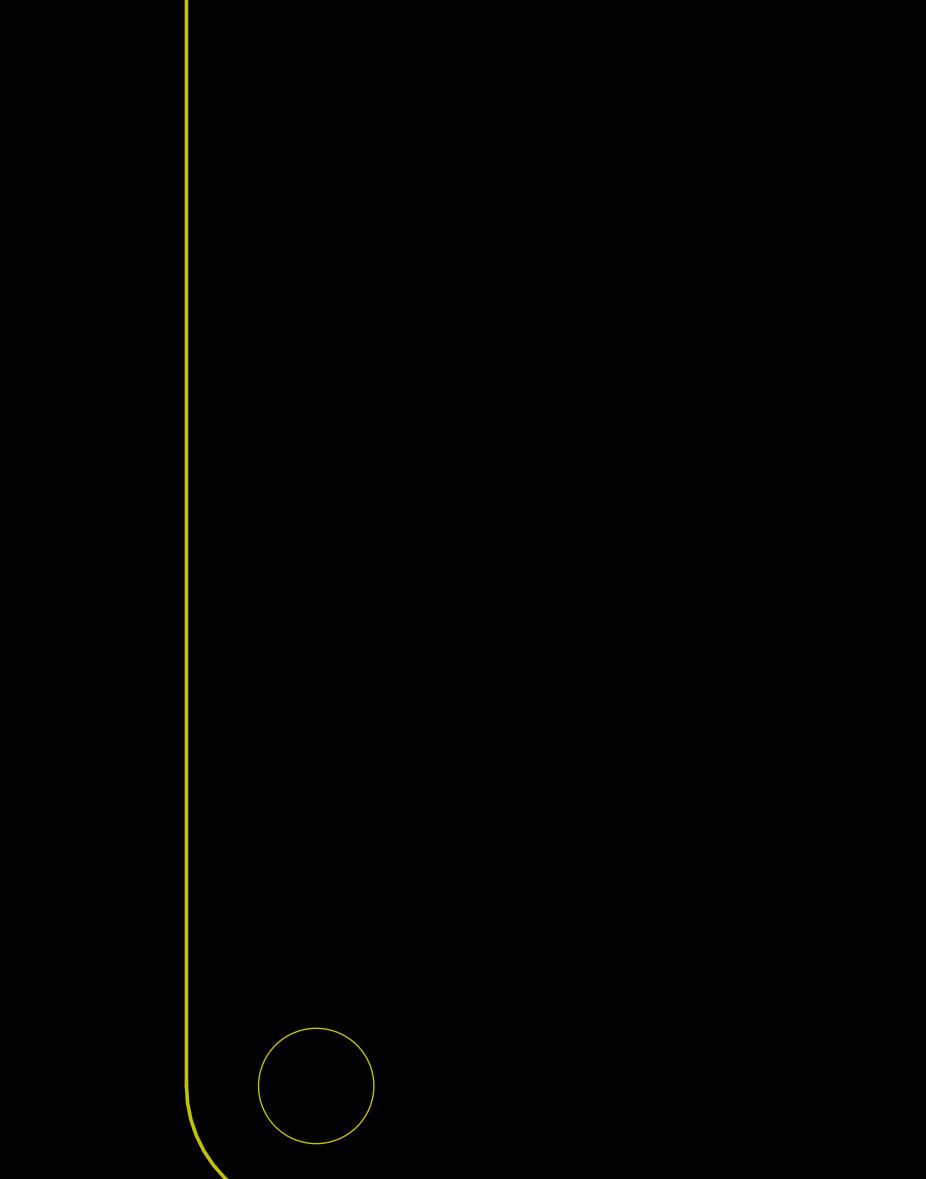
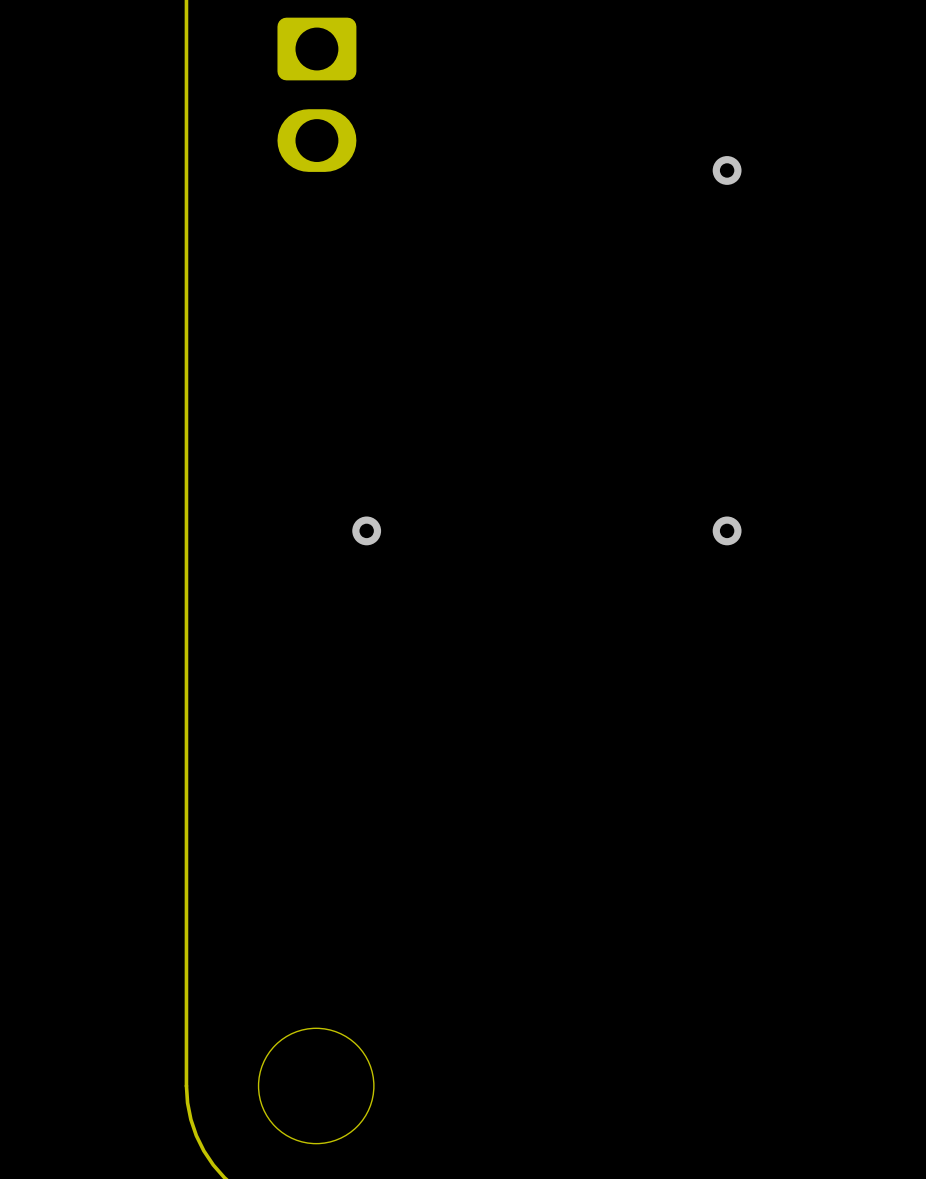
part: none -> (316, 94)
via: none -> (727, 170)
via: none -> (366, 530)
via: none -> (727, 530)

